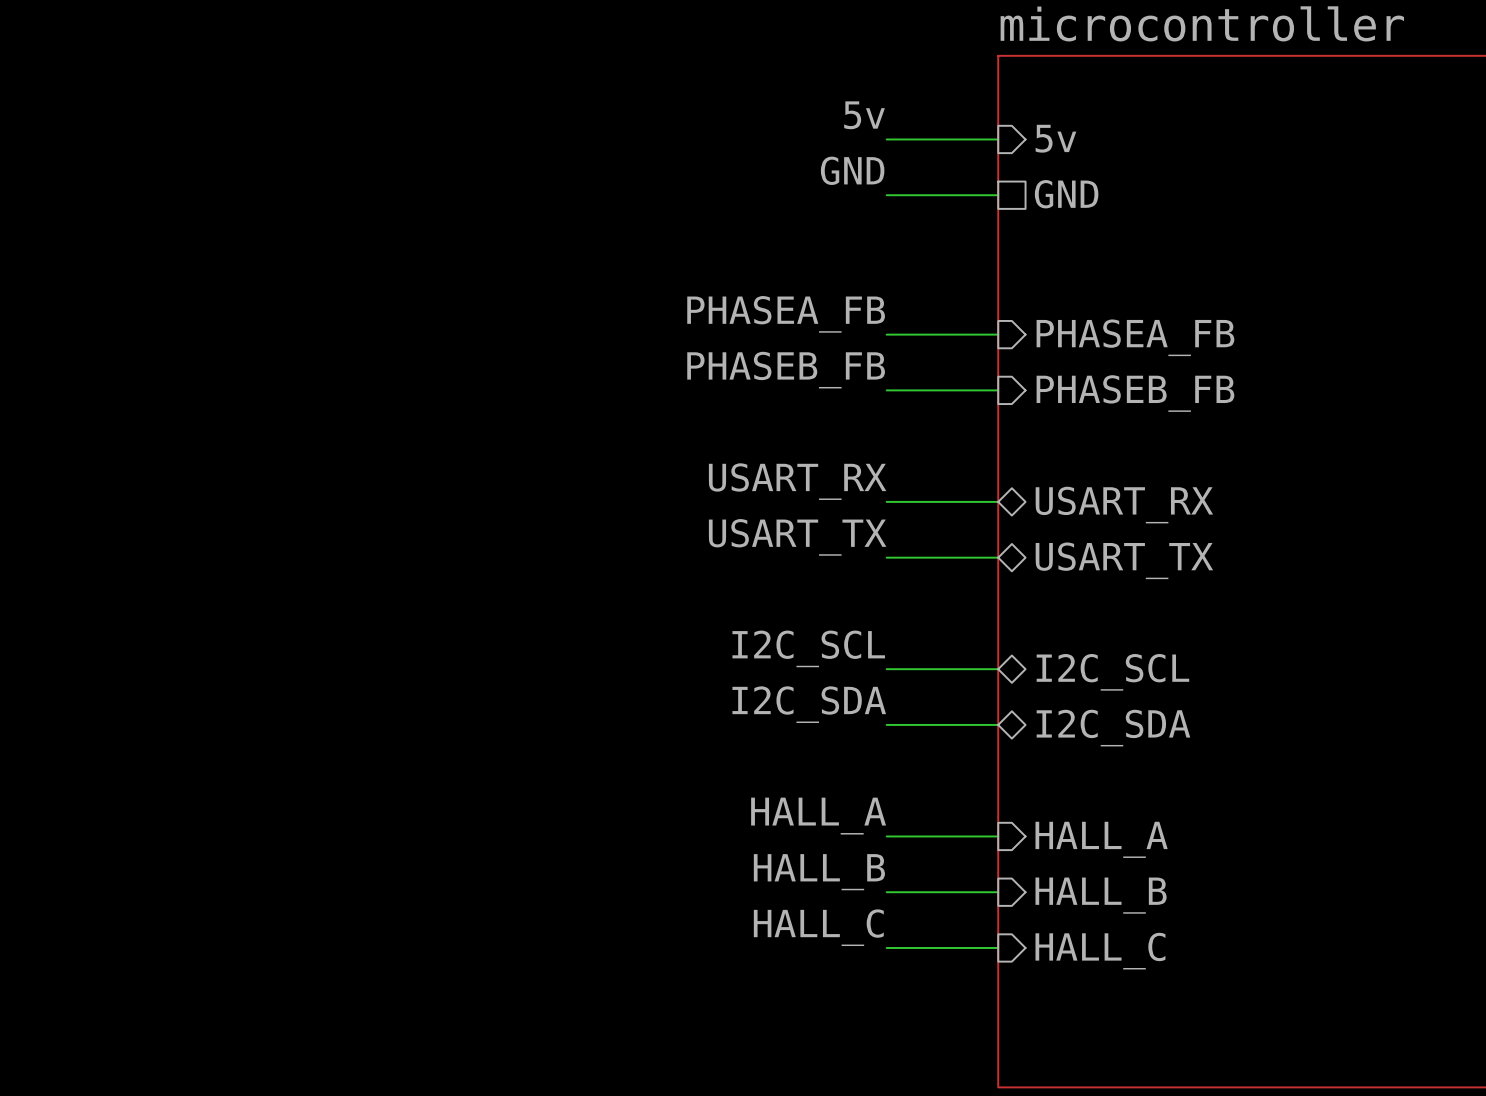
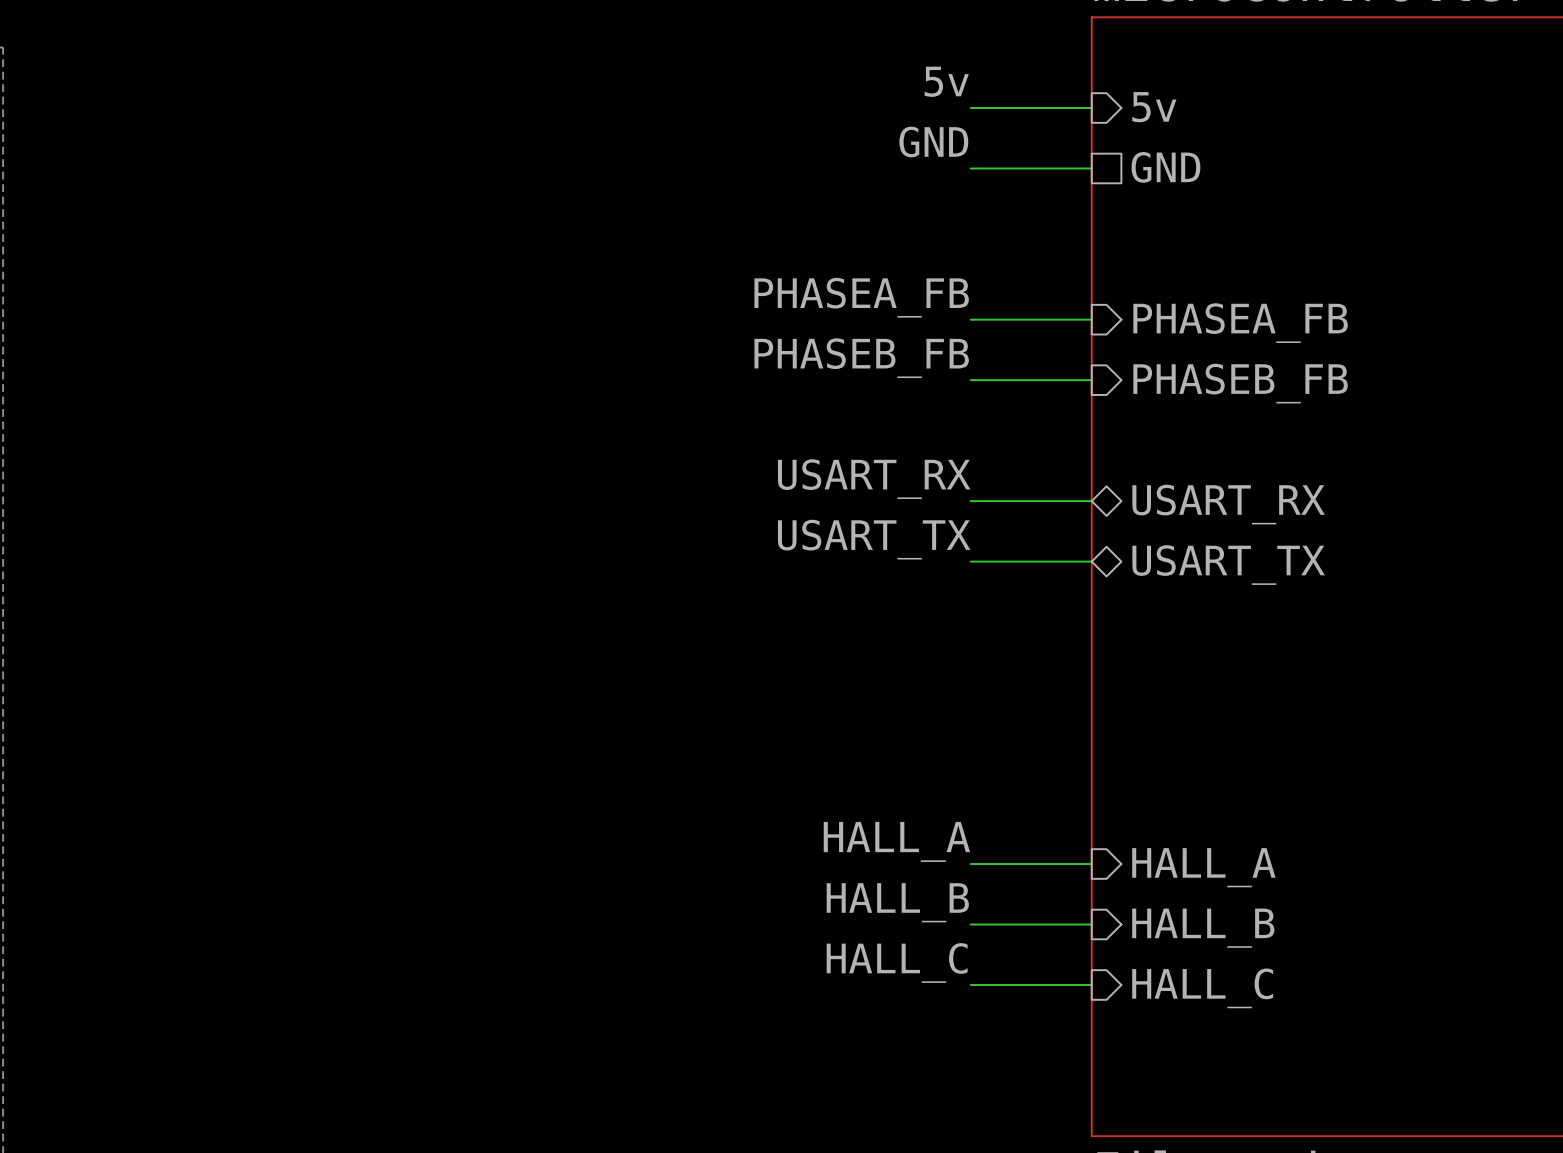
label: I2C_SCL (808, 648) -> none
wire: (886, 669) (998, 669) -> none
sheet pin: I2C_SCL (1112, 672) -> none
label: I2C_SDA (809, 704) -> none
wire: (886, 724) (998, 724) -> none
sheet pin: I2C_SDA (1113, 728) -> none

